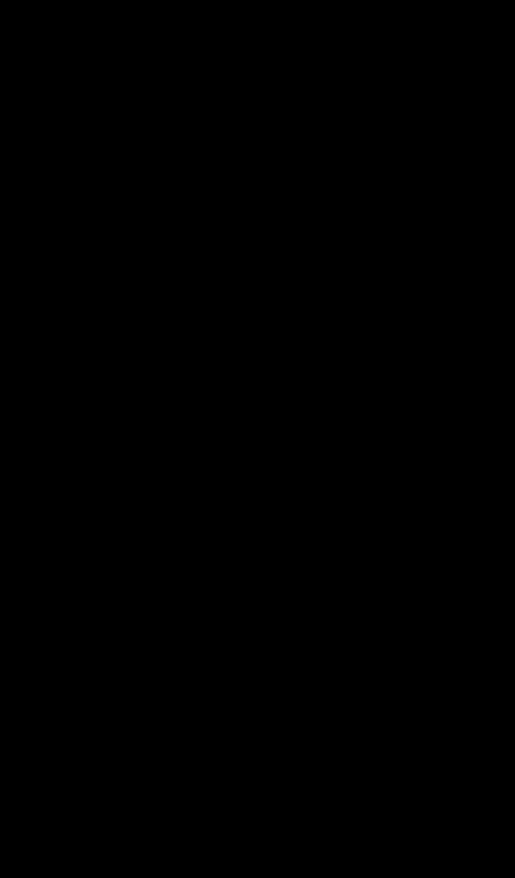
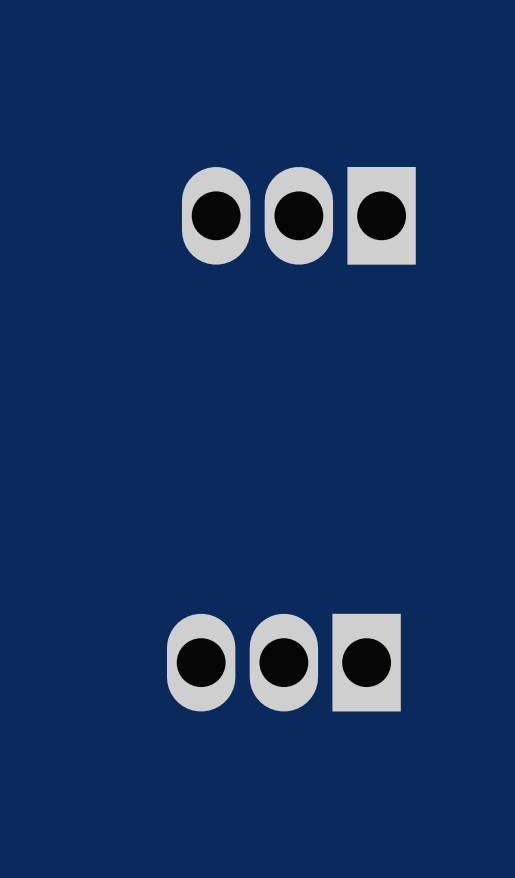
part: none -> (298, 215)
part: none -> (283, 662)

